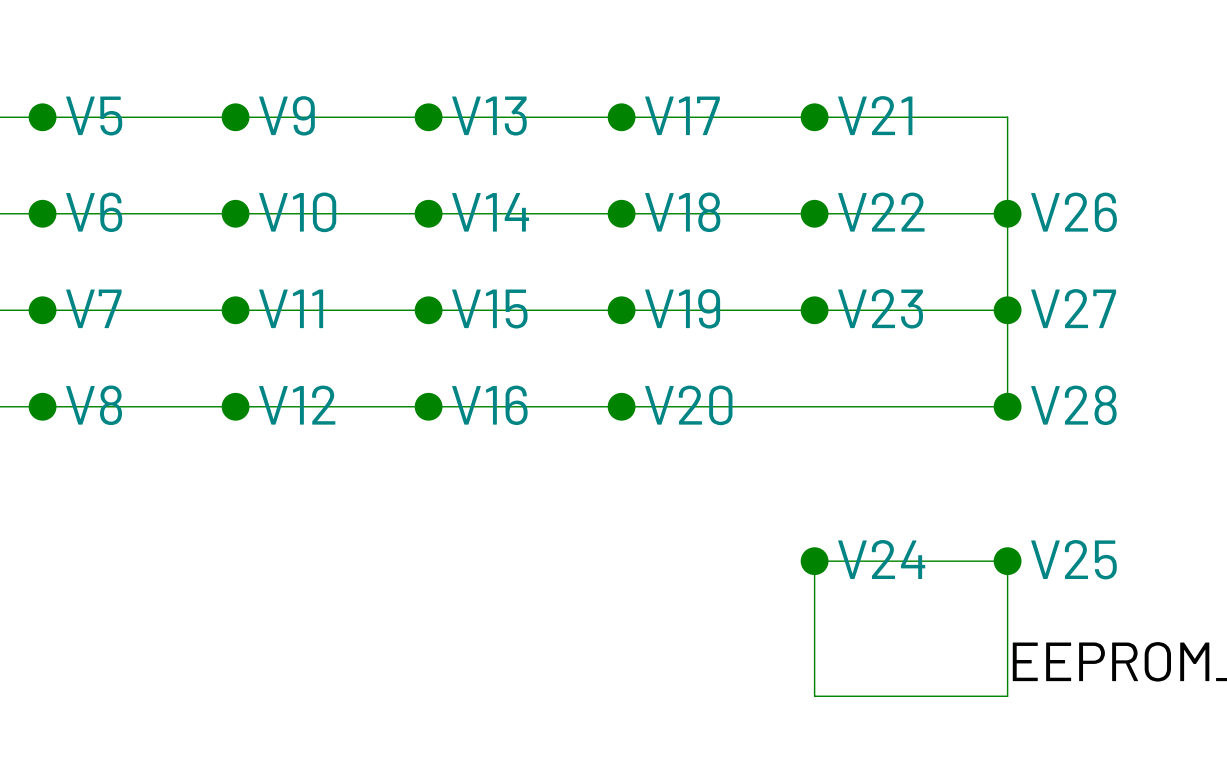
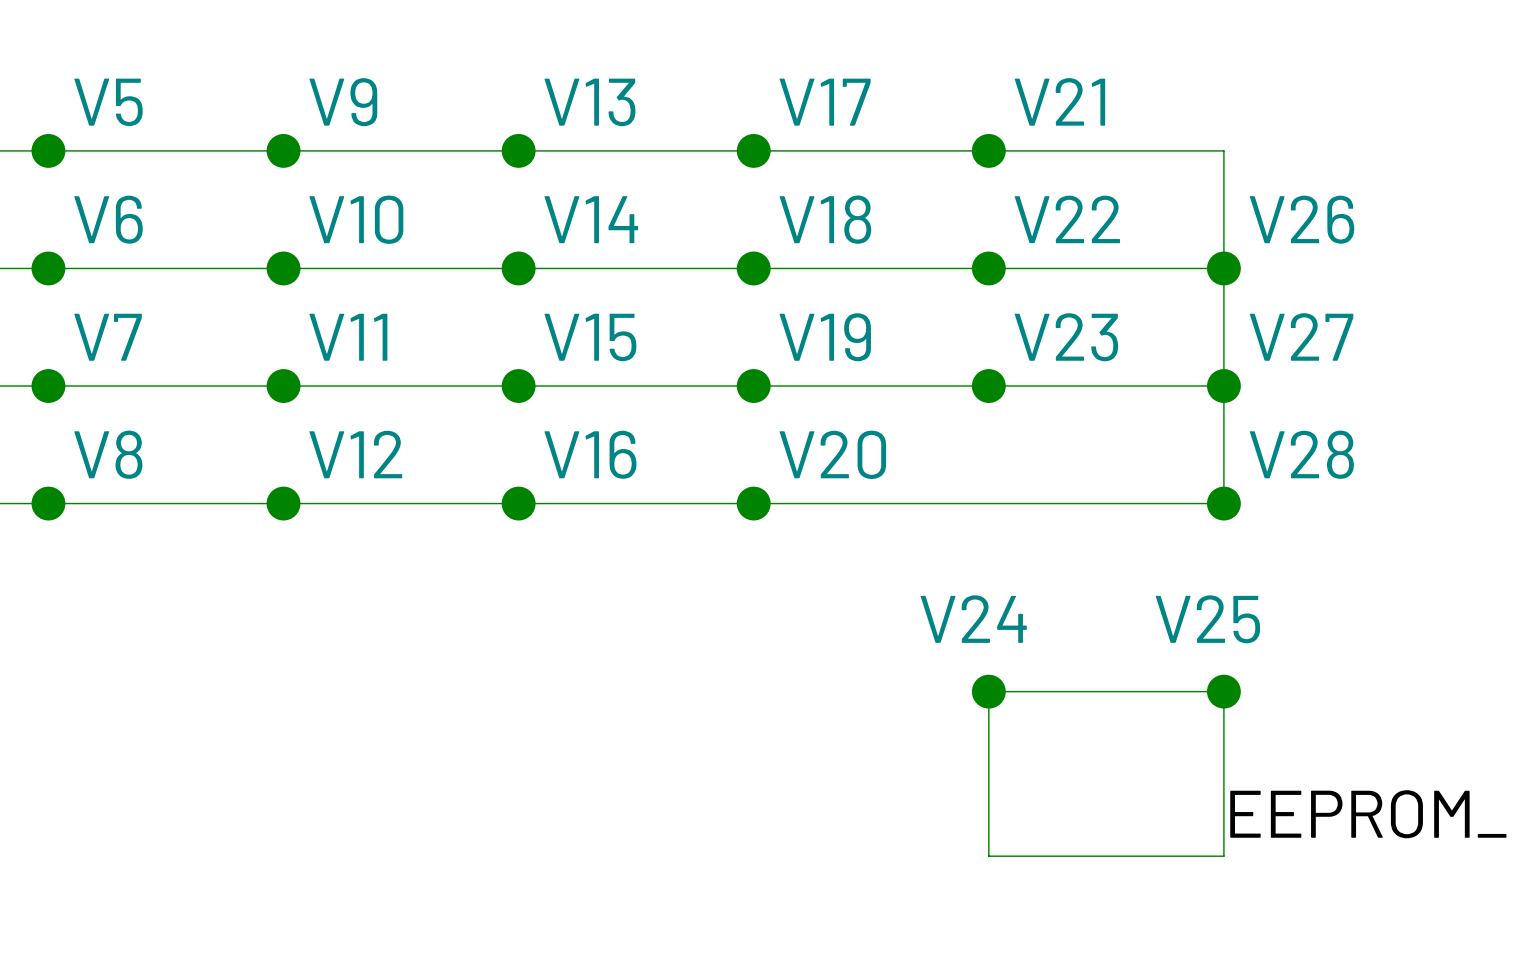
V9 position: (286, 115) -> (343, 102)
V17 position: (682, 115) -> (825, 102)
V21 position: (875, 115) -> (1059, 101)
V5 position: (94, 116) -> (108, 102)
V13 position: (489, 116) -> (589, 102)
V6 position: (94, 212) -> (108, 219)
V10 position: (297, 212) -> (356, 219)
V14 position: (490, 212) -> (591, 219)
V18 position: (682, 212) -> (825, 219)
V22 position: (881, 212) -> (1067, 219)
V26 position: (1074, 212) -> (1302, 219)
V7 position: (93, 308) -> (108, 337)
V11 position: (291, 308) -> (348, 337)
V19 position: (682, 308) -> (825, 337)
V23 position: (880, 308) -> (1066, 337)
V27 position: (1073, 308) -> (1301, 336)
V15 position: (489, 309) -> (590, 337)
V8 position: (94, 405) -> (108, 454)
V12 position: (297, 405) -> (355, 454)
V16 position: (489, 405) -> (590, 454)
V20 position: (688, 405) -> (832, 454)
V28 position: (1073, 405) -> (1301, 454)
V24 position: (881, 559) -> (973, 619)
V25 position: (1073, 559) -> (1207, 619)

